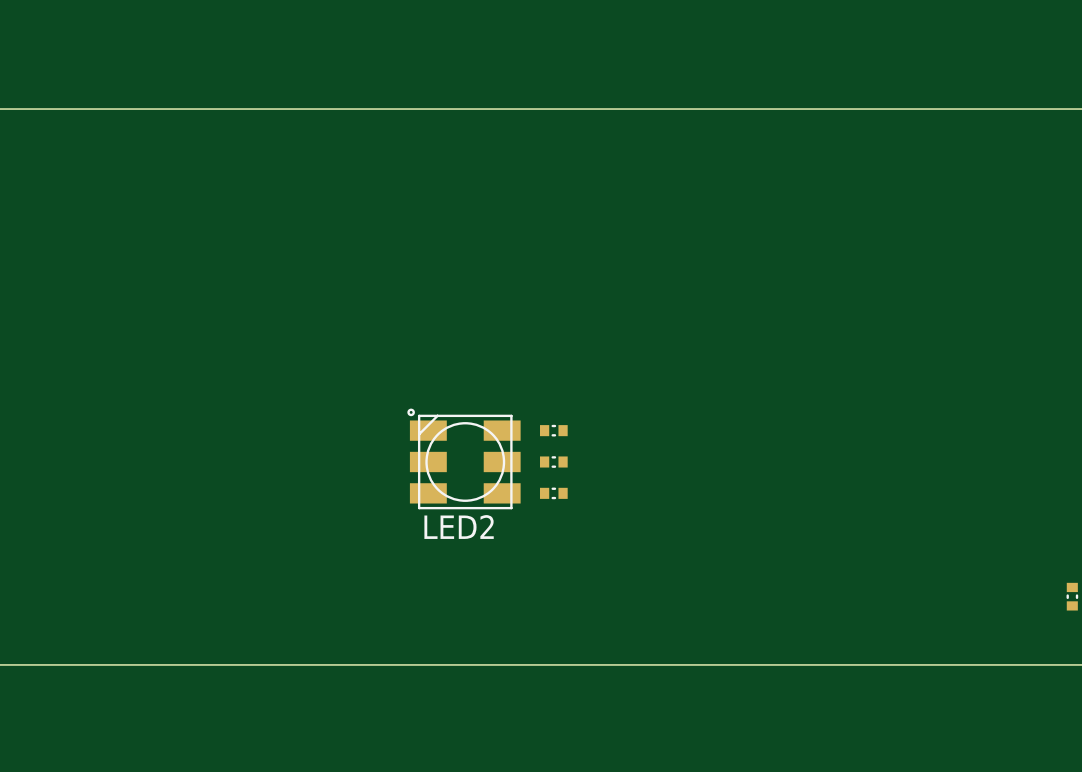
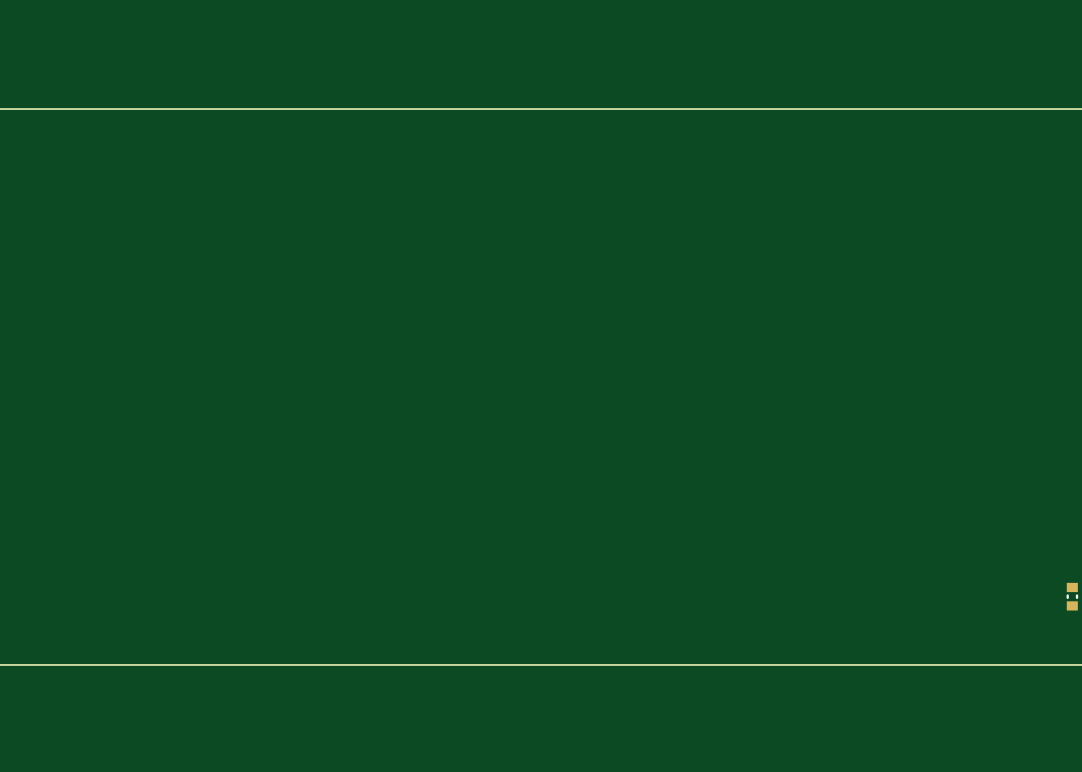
part: (553, 430) -> none
LED2: (463, 458) -> none
part: (553, 462) -> none
part: (553, 493) -> none

